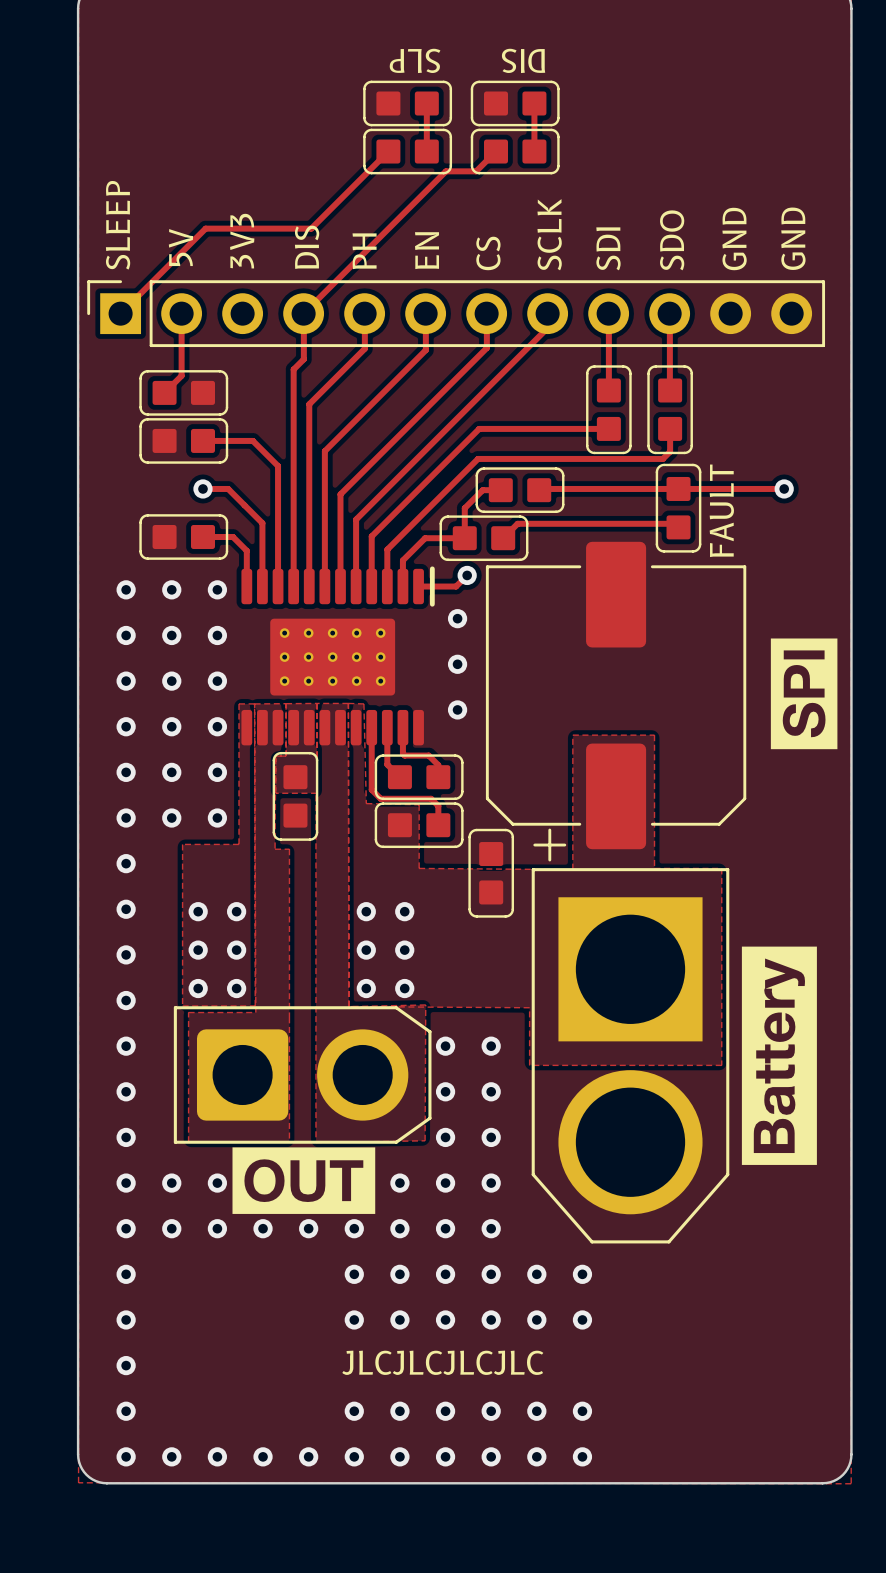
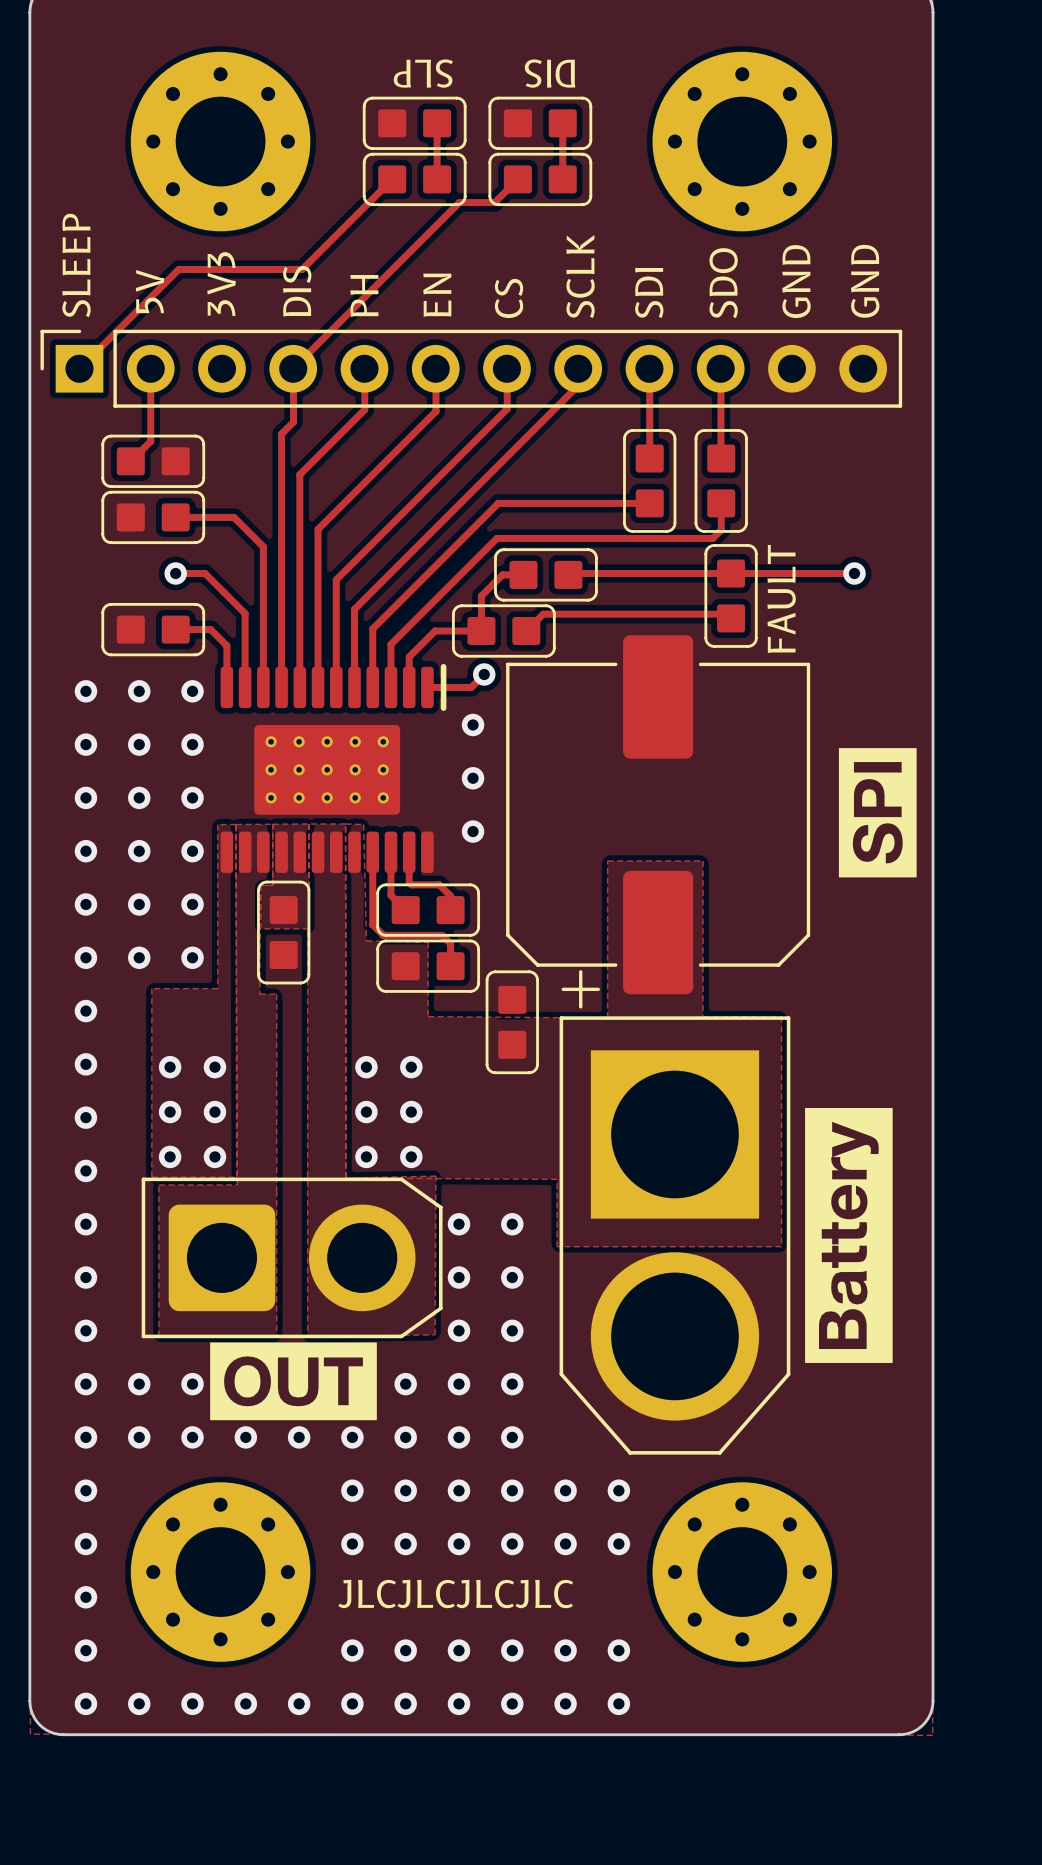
part: none -> (220, 141)
part: none -> (742, 141)
part: none -> (220, 1572)
part: none -> (742, 1572)

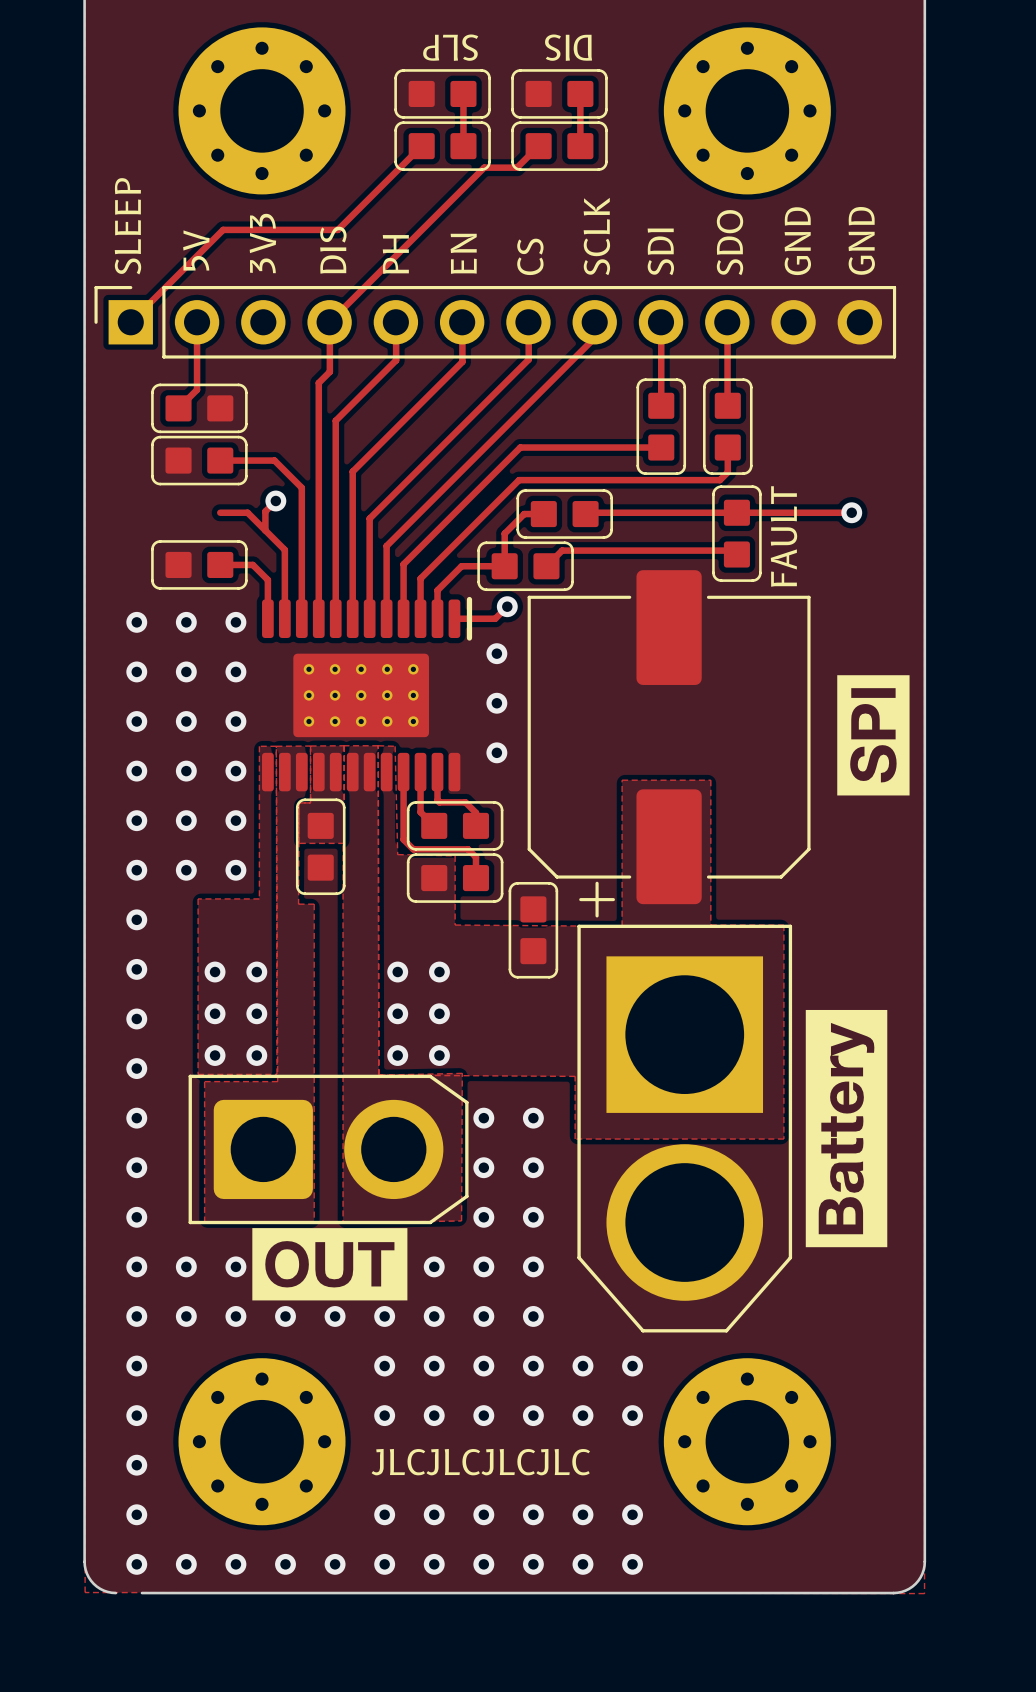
track: none -> (275, 501) (265, 511) (265, 530)
via position: (175, 573) -> (275, 501)
board edge: (63, 1734) (91, 1734) -> none

